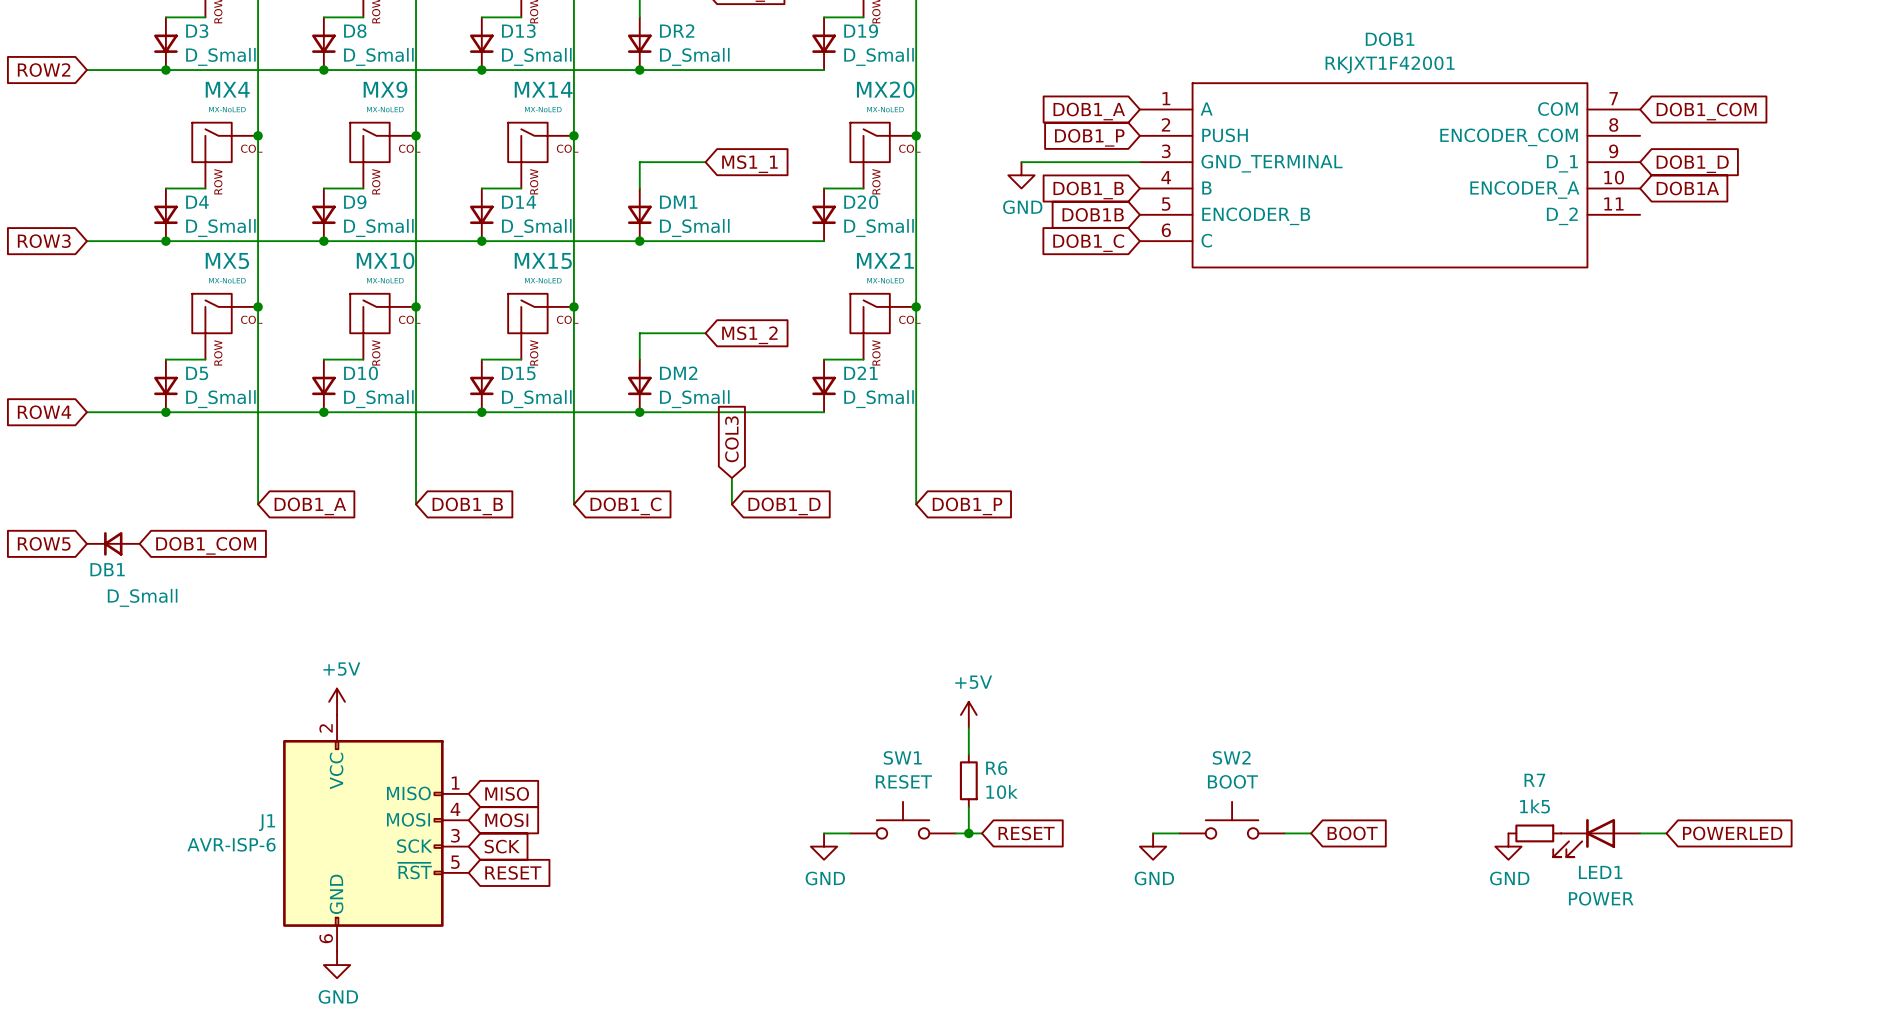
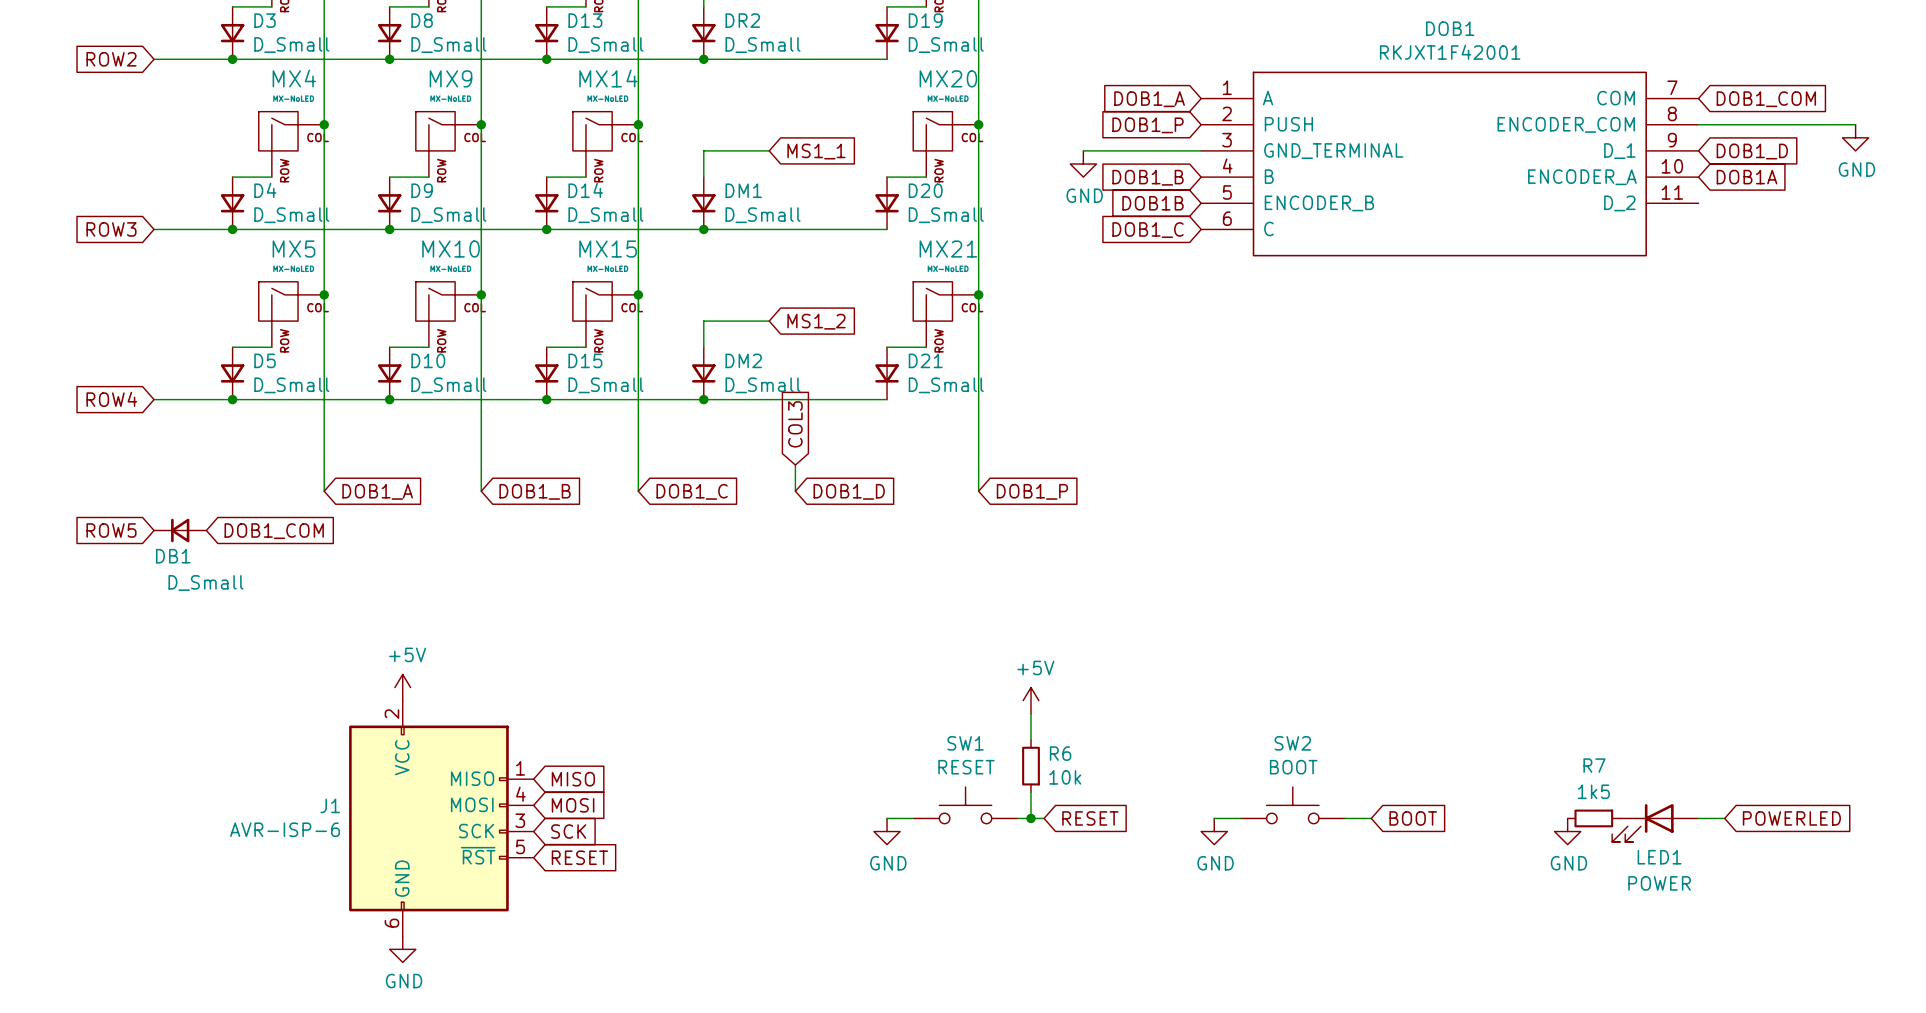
wire: none -> (1698, 124) (1855, 124)
power symbol: none -> GND (1855, 137)

